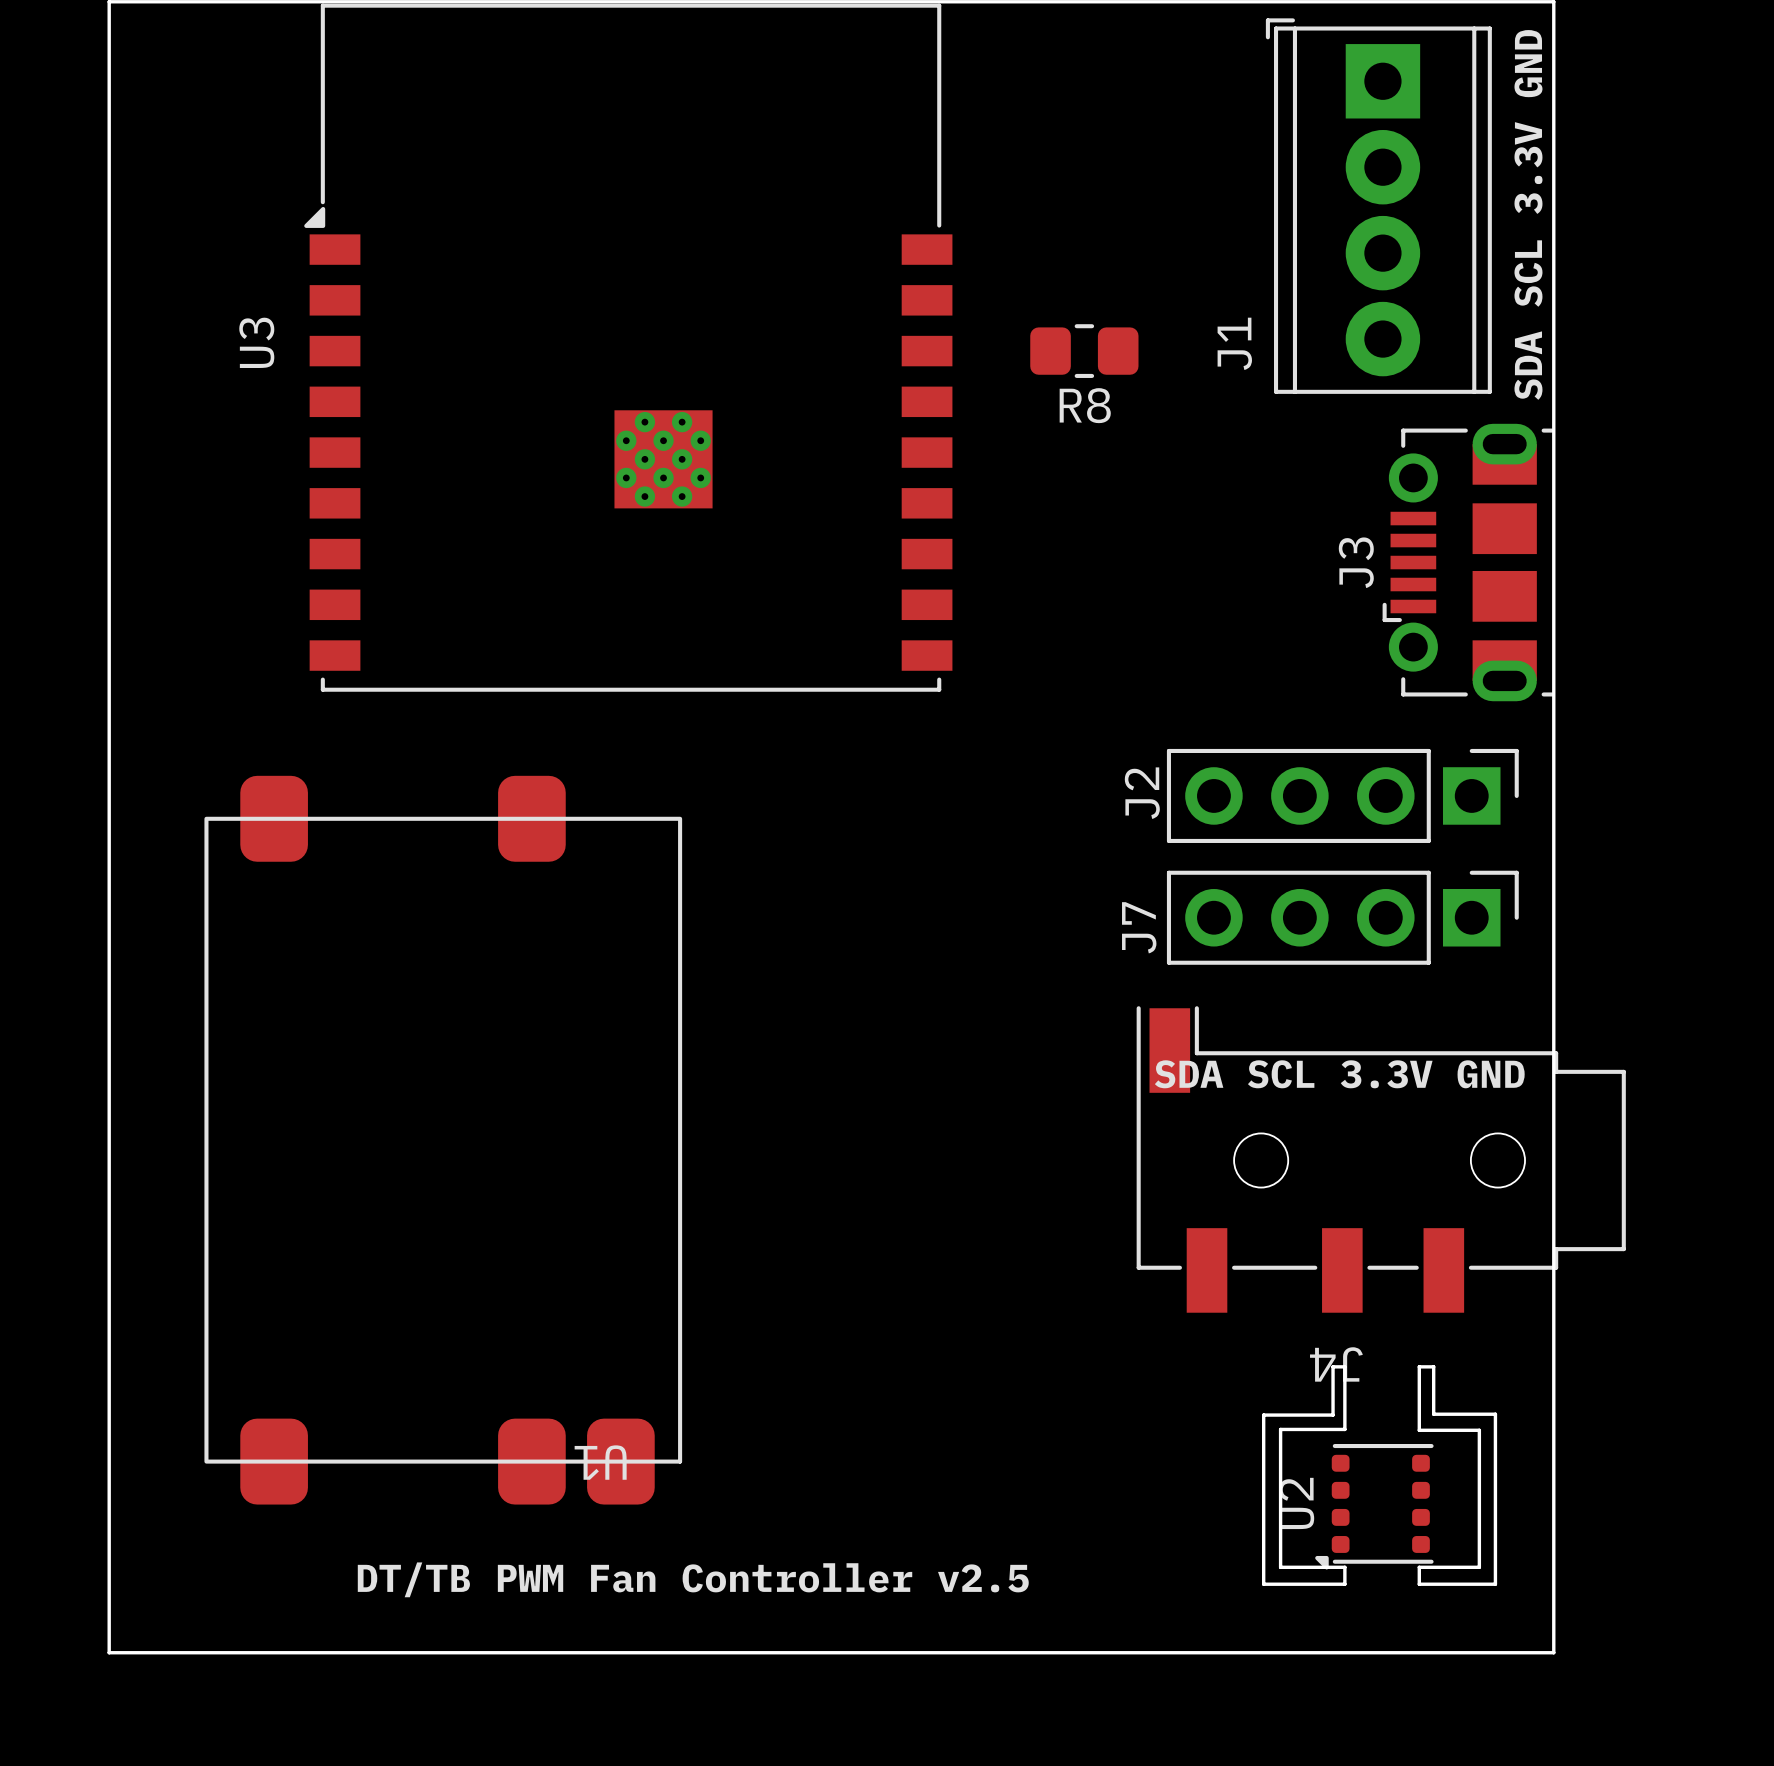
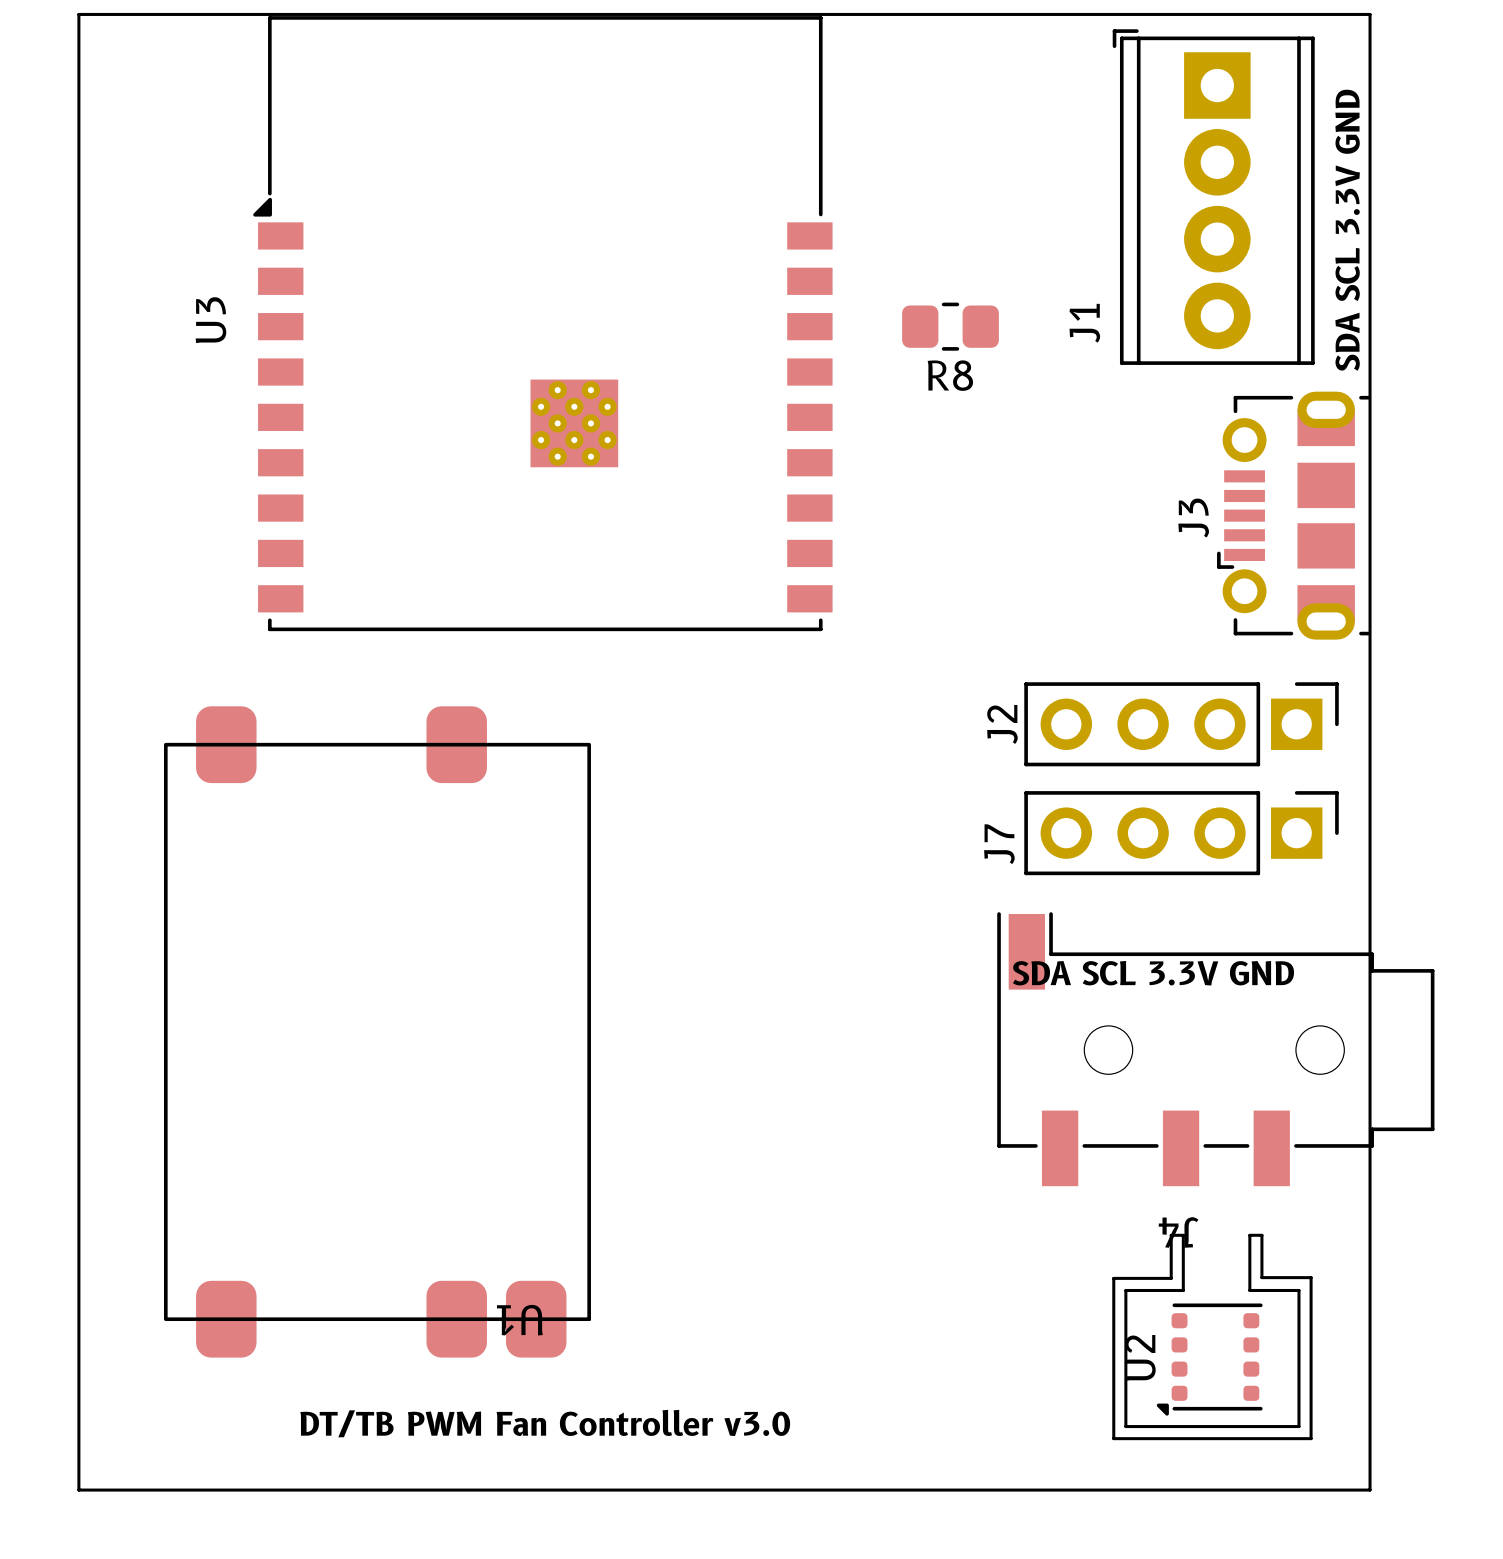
board edge: (1344, 1367) (1333, 1366) (1333, 1415) (1263, 1415) (1263, 1584) (1344, 1584) (1344, 1567) (1280, 1567) -> (1249, 1290) (1298, 1290) (1298, 1426) (1125, 1426) (1125, 1413)
board edge: (1419, 1367) (1433, 1366) (1433, 1414) (1495, 1414) (1495, 1584) (1419, 1584) (1419, 1567) (1479, 1567) (1479, 1430) (1419, 1429) -> (1249, 1235) (1261, 1235) (1261, 1277) (1311, 1277) (1311, 1438) (1113, 1438) (1113, 1278) (1171, 1278) (1171, 1235) (1183, 1235)
text: DT/TB PWM Fan Controller v2.5 (693, 1579) -> DT/TB PWM Fan Controller v3.0 (545, 1423)

